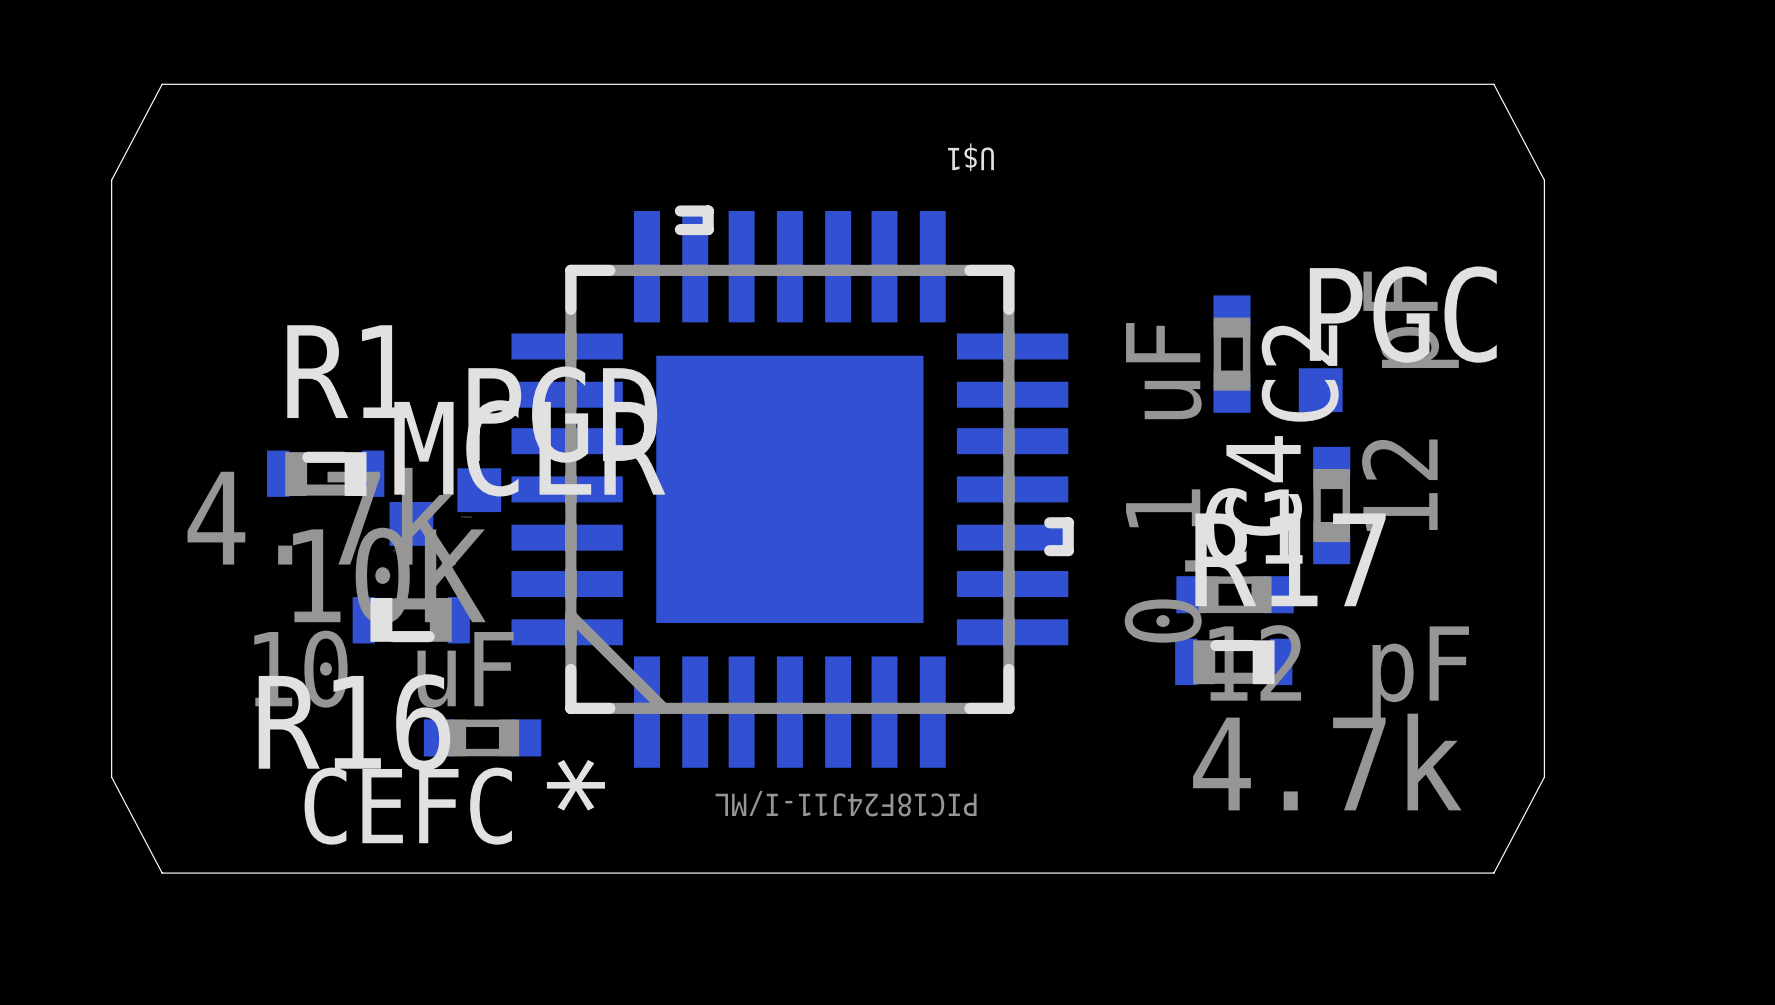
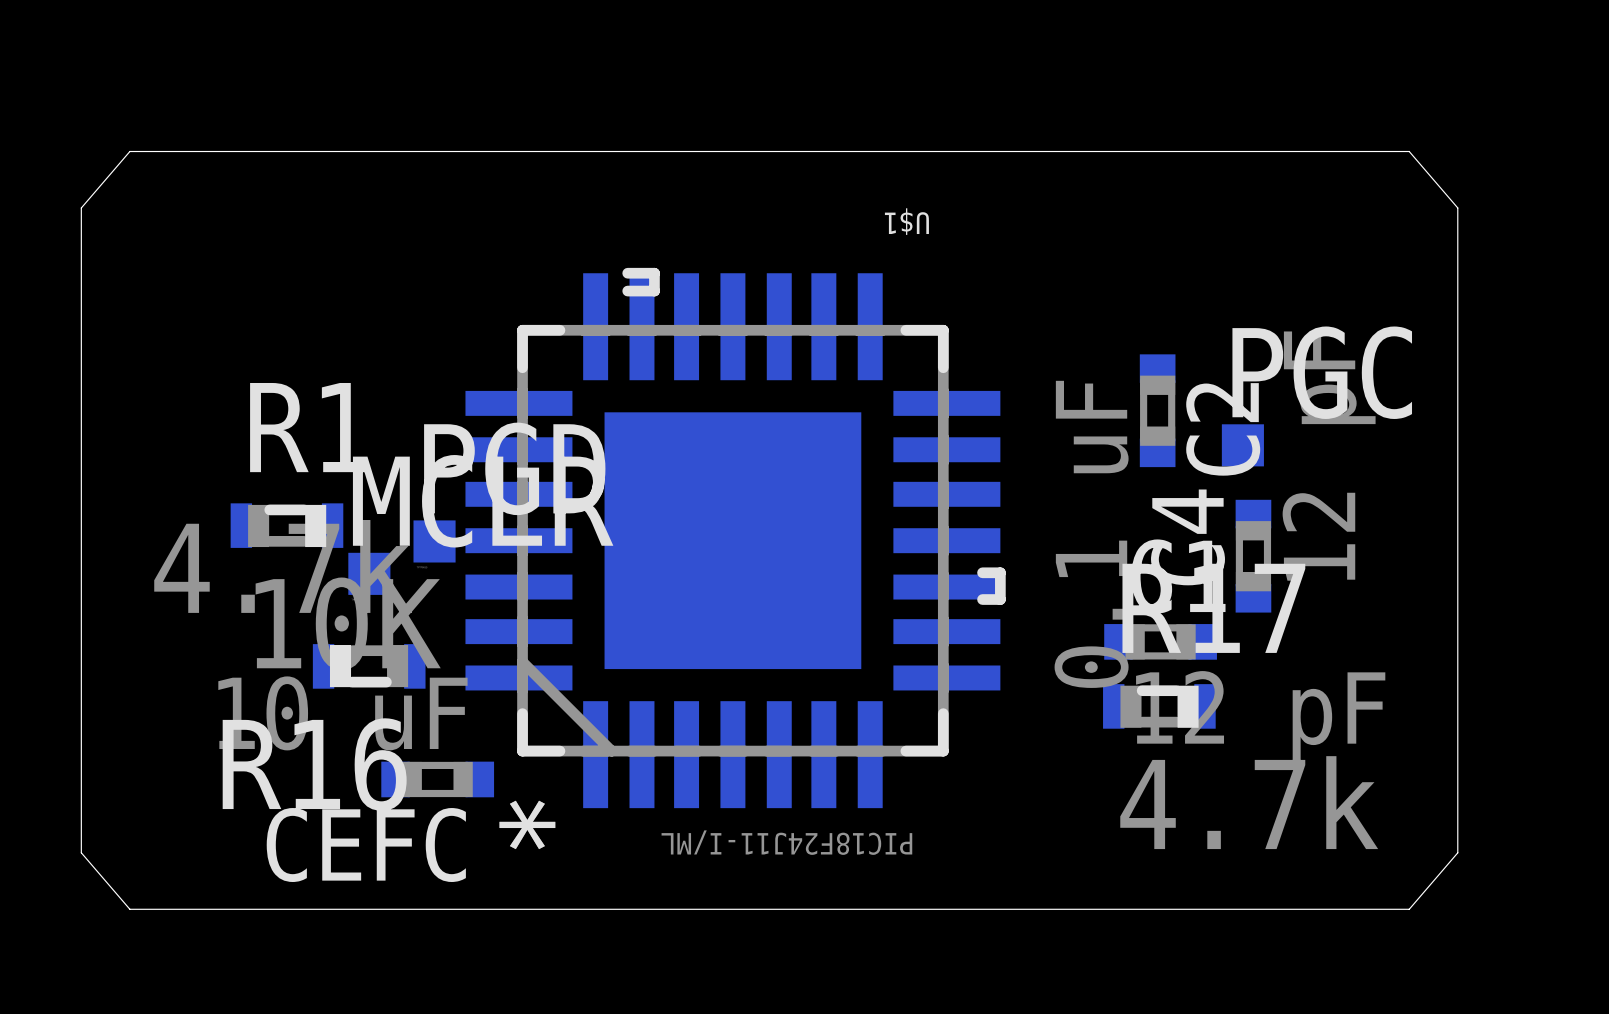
board edge: (162, 84) (111, 180) -> (129, 151) (81, 207) (81, 243)
board edge: (1493, 84) (1544, 180) -> (1409, 151) (1457, 207) (1457, 243)
board edge: (111, 777) (162, 873) -> (81, 817) (81, 852) (129, 909)
board edge: (1544, 777) (1493, 873) -> (1457, 817) (1457, 852) (1409, 909)

